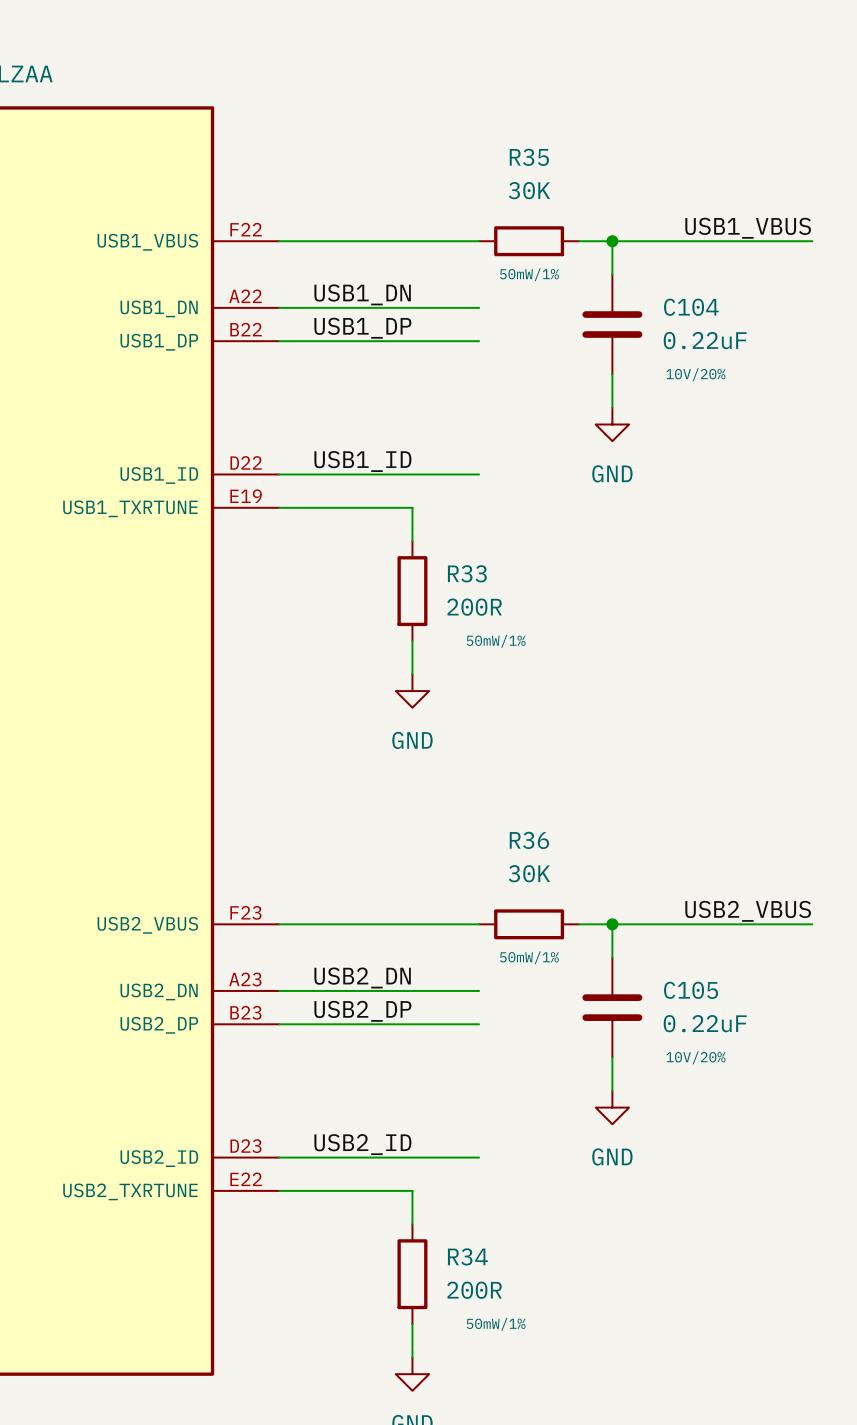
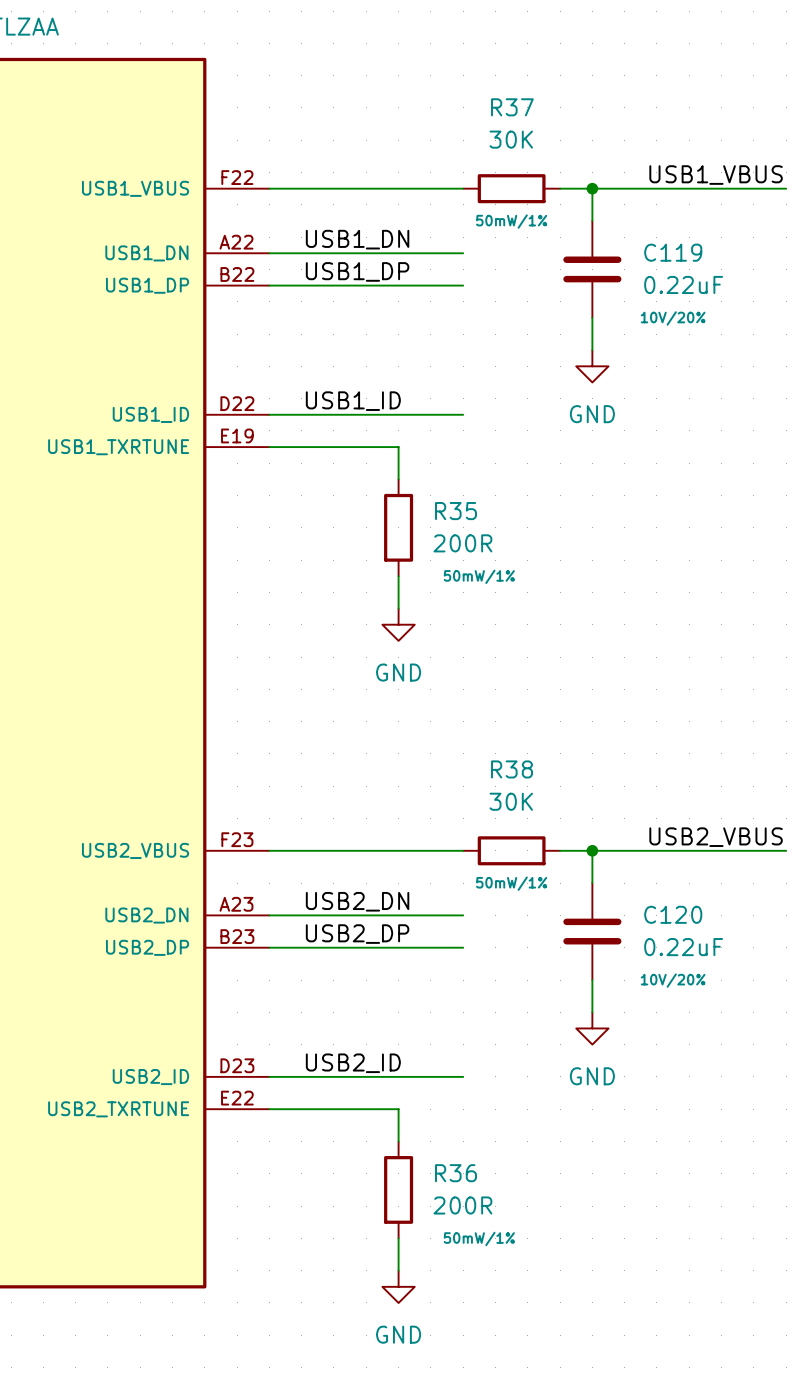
R35 name: R35 (529, 157) -> R37 (512, 107)
C104 name: C104 (691, 307) -> C119 (673, 252)
R33 name: R33 (467, 573) -> R35 (456, 511)
R36 name: R36 (529, 840) -> R38 (512, 769)
C105 name: C105 (691, 990) -> C120 (673, 914)
R34 name: R34 (467, 1256) -> R36 (456, 1173)

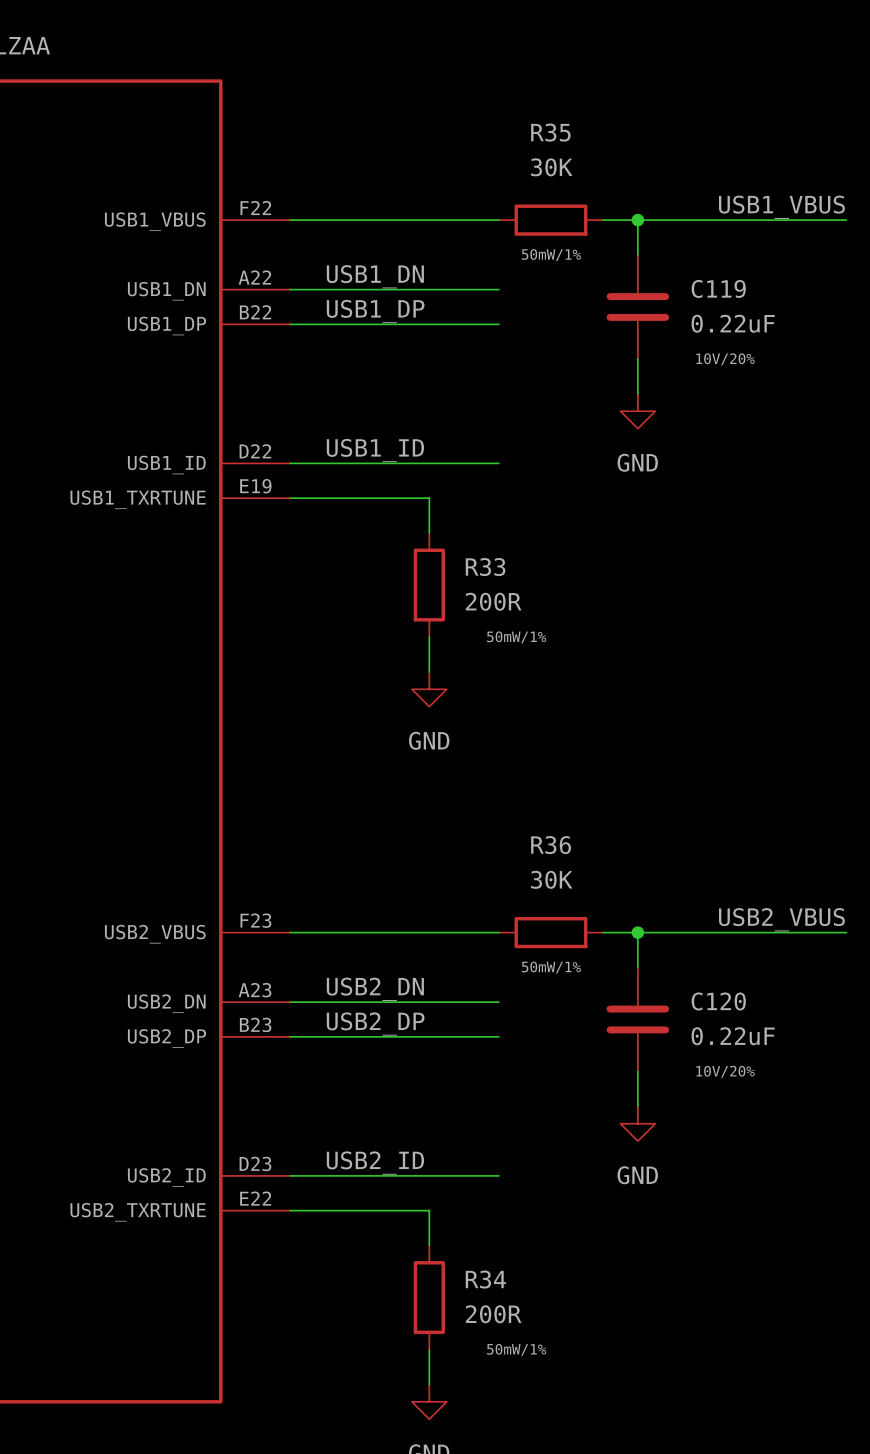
R37 name: R37 (512, 107) -> R35 (550, 132)
R35 name: R35 (456, 511) -> R33 (485, 567)
R38 name: R38 (512, 769) -> R36 (551, 845)
R36 name: R36 (456, 1173) -> R34 (485, 1279)

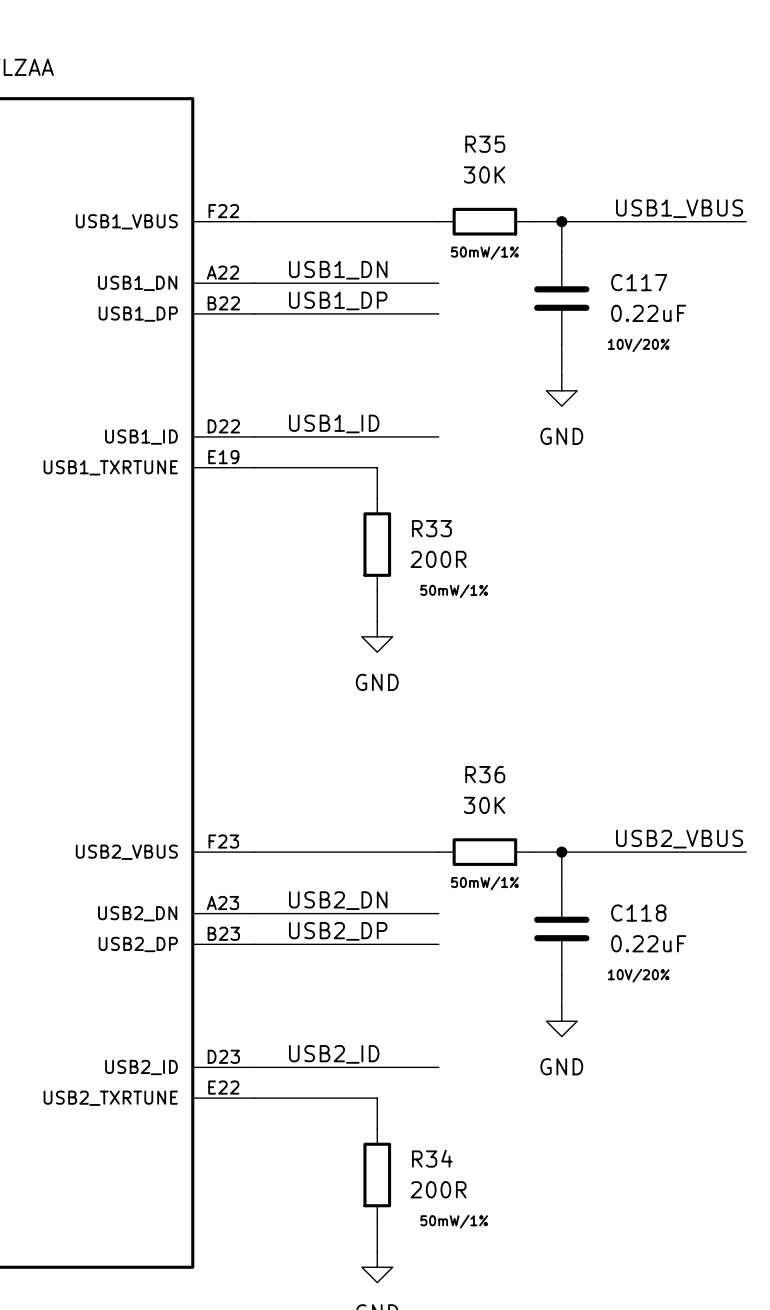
C119 name: C119 (718, 288) -> C117 (639, 282)
C120 name: C120 (718, 1001) -> C118 (638, 913)

